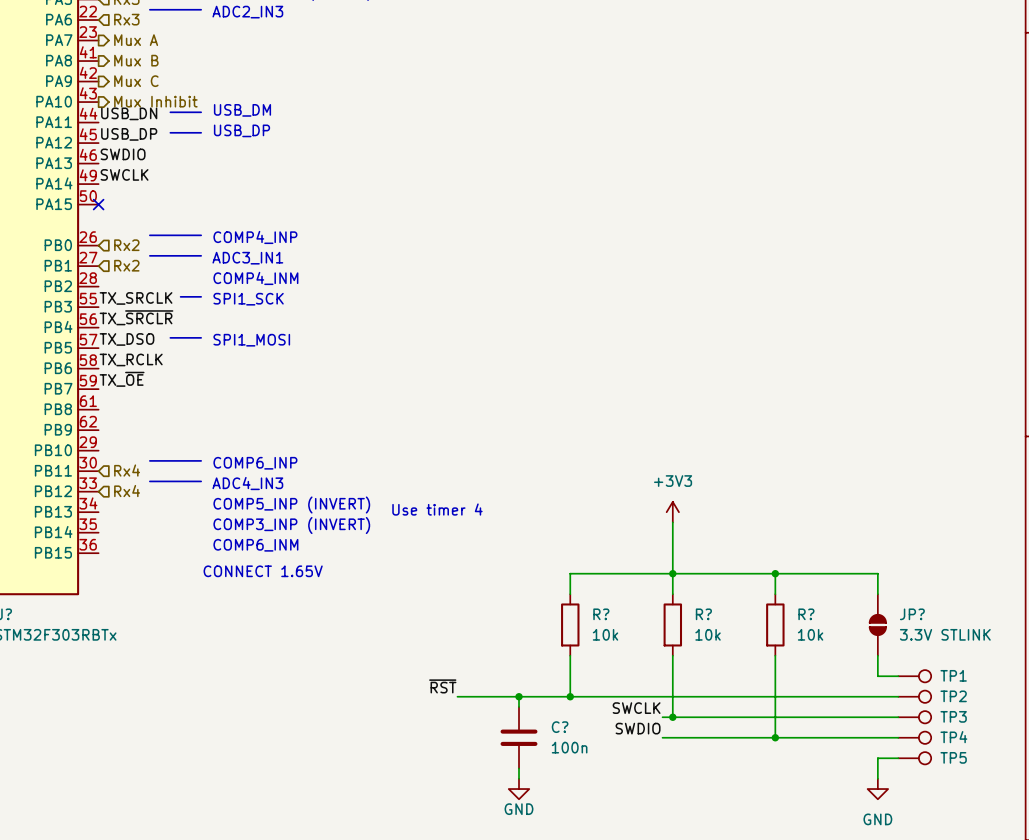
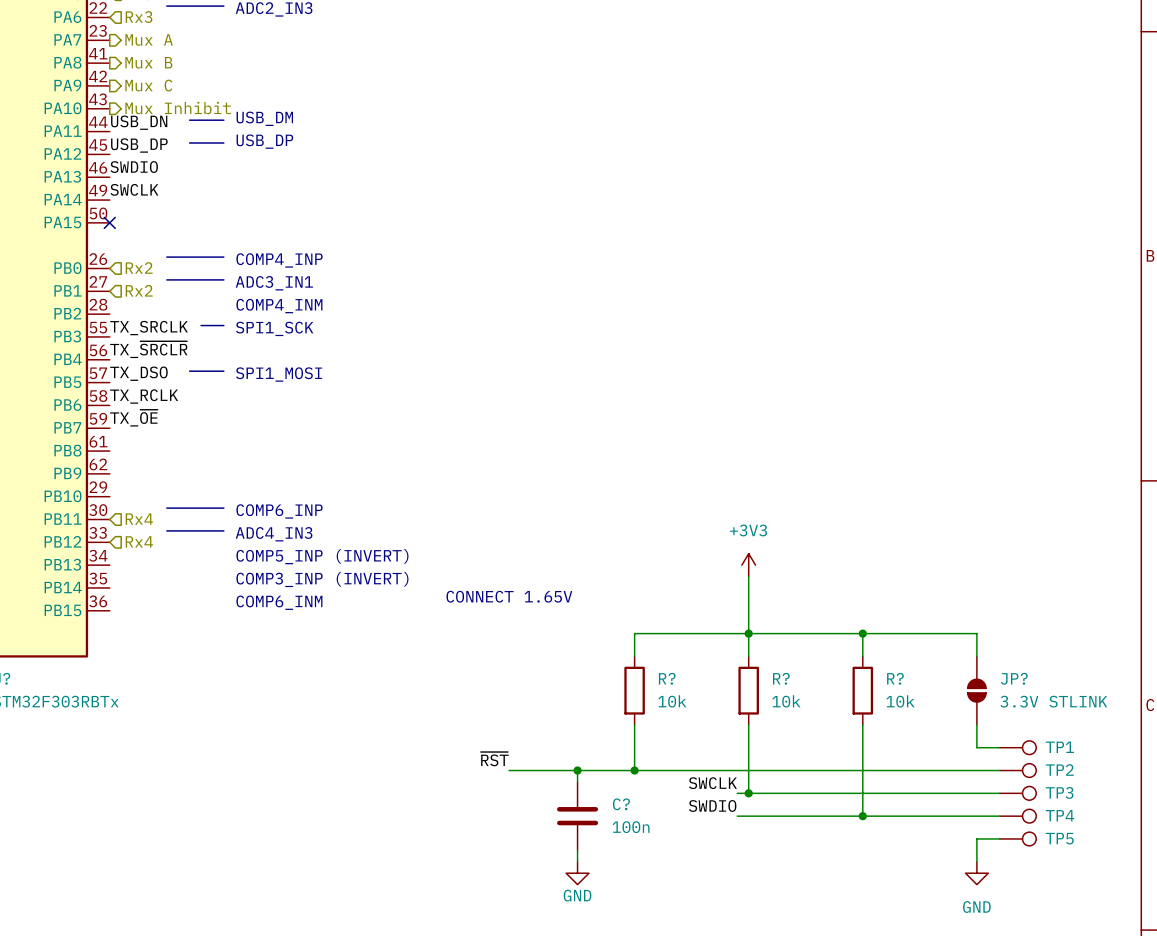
text: Use timer 4 (437, 509) -> none
text position: CONNECT 1.65V (263, 571) -> CONNECT 1.65V (509, 596)

